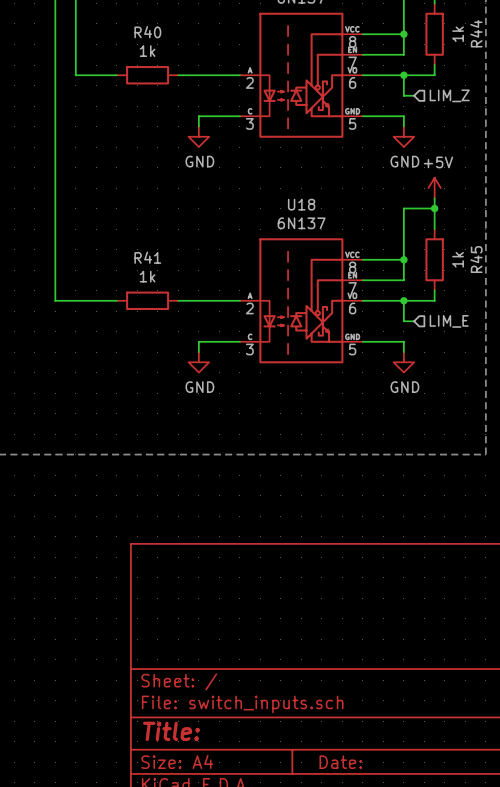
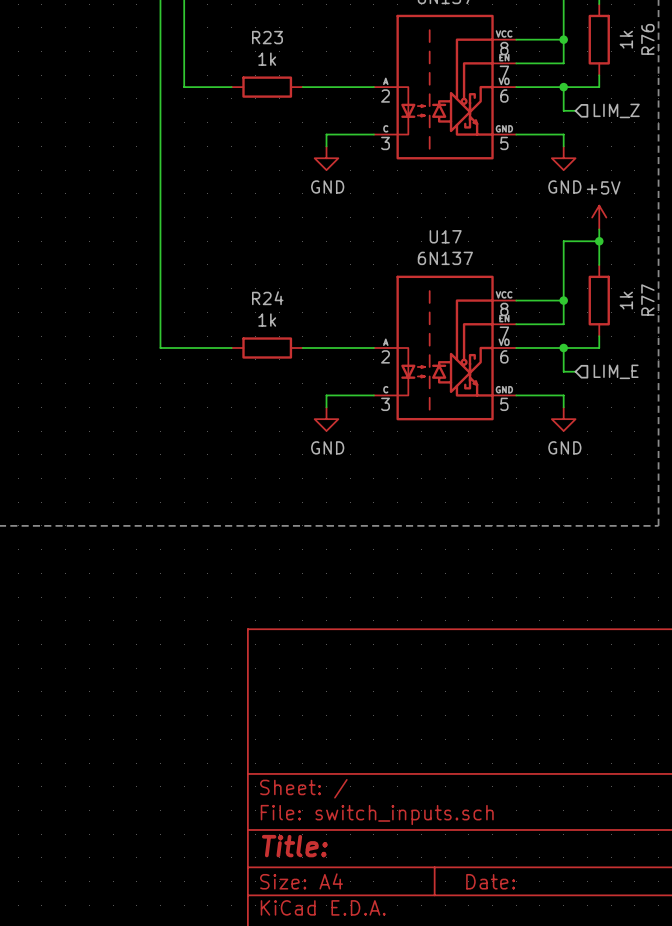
R40 name: R40 (147, 32) -> R23 (267, 37)
R44 name: R44 (476, 33) -> R76 (647, 39)
U18 name: U18 (301, 204) -> U17 (445, 236)
R41 name: R41 (147, 257) -> R24 (267, 298)
R45 name: R45 (476, 259) -> R77 (647, 300)

